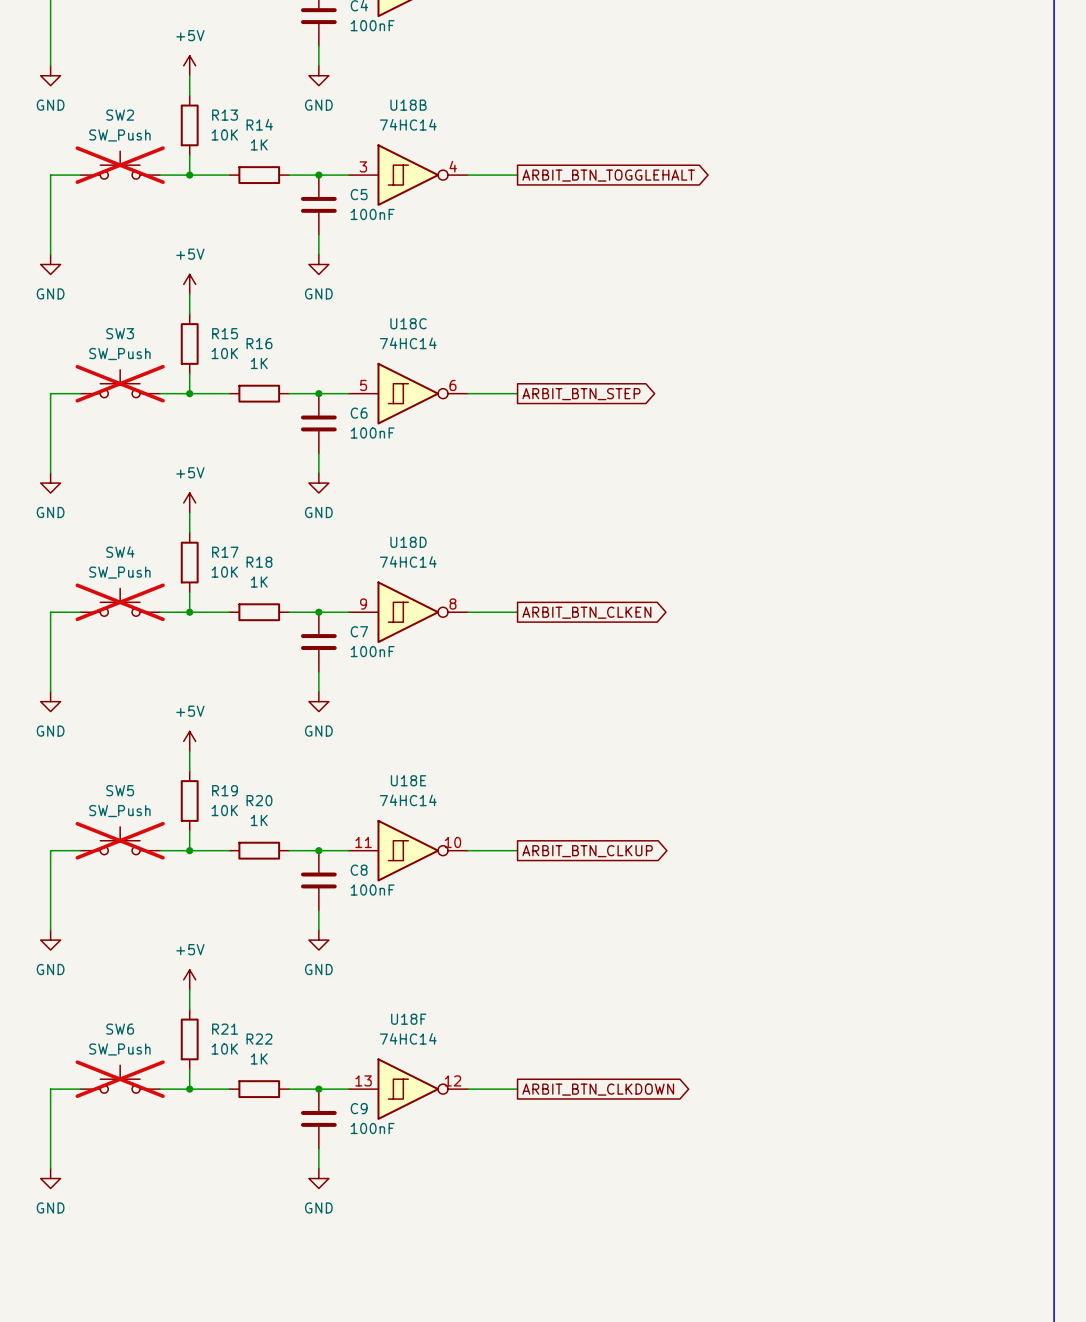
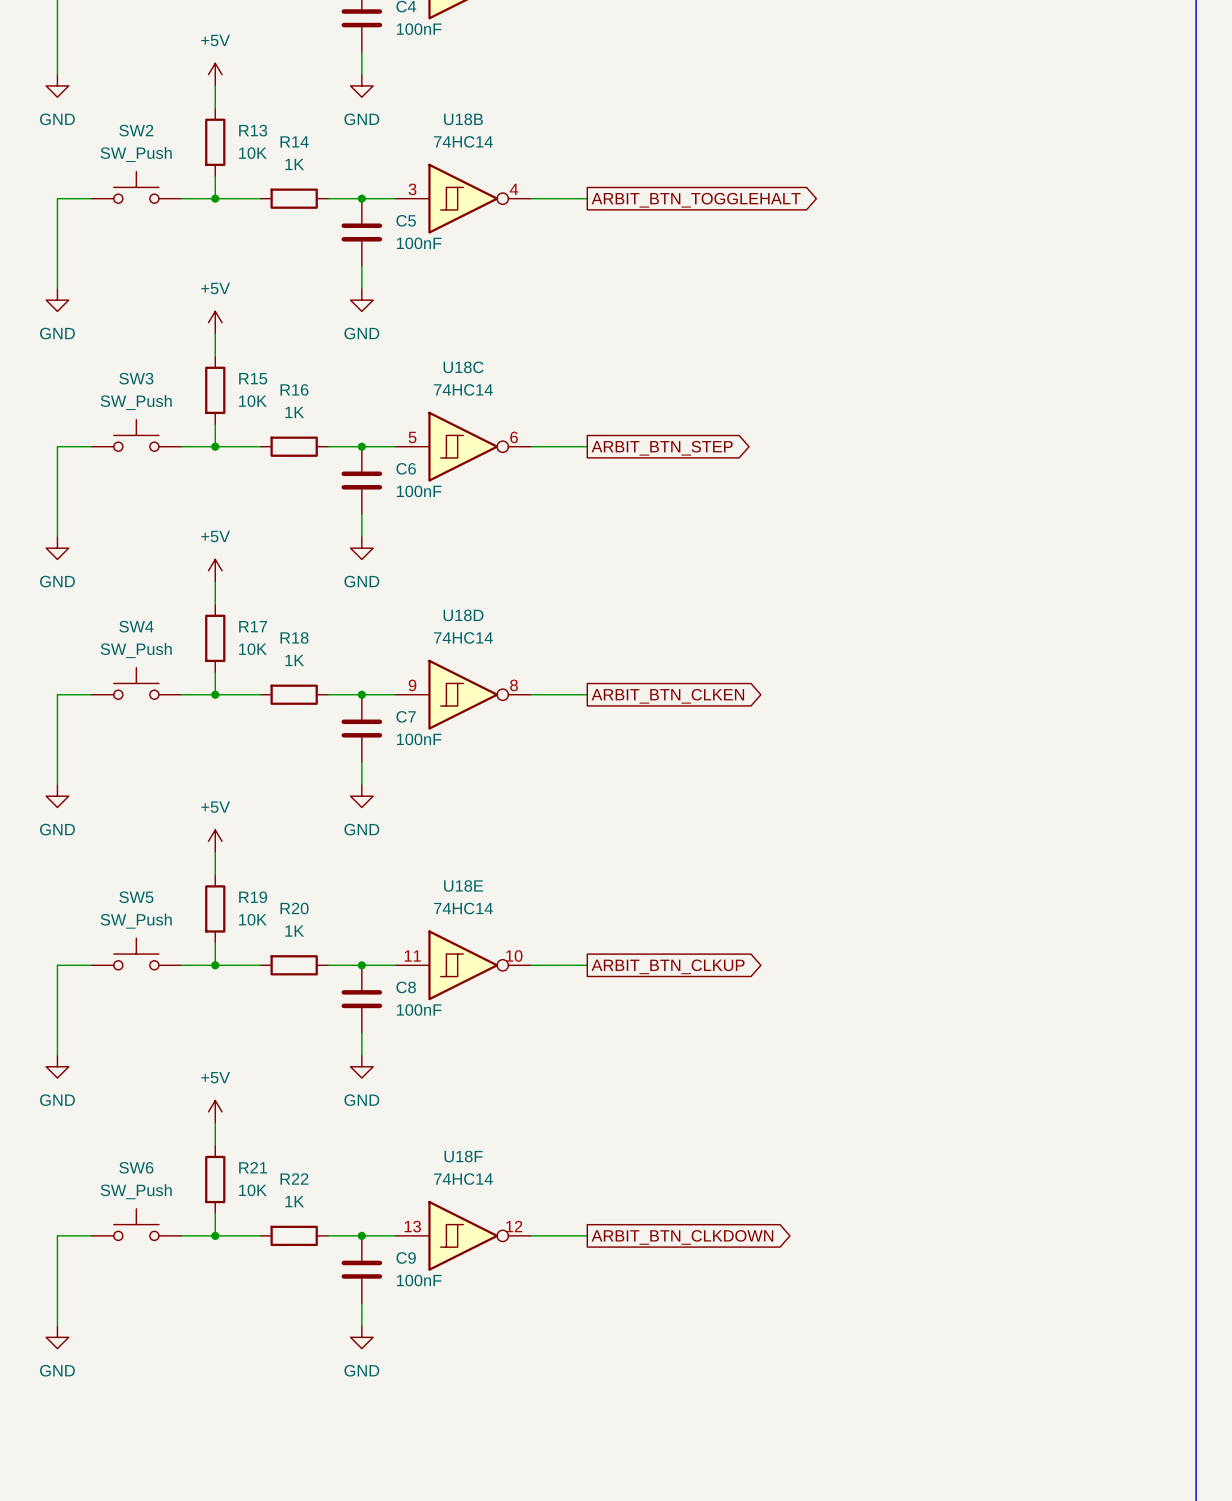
SW2 do-not-place cross: (120, 165) -> none
SW3 do-not-place cross: (120, 383) -> none
SW4 do-not-place cross: (120, 602) -> none
SW5 do-not-place cross: (120, 840) -> none
SW6 do-not-place cross: (120, 1079) -> none

